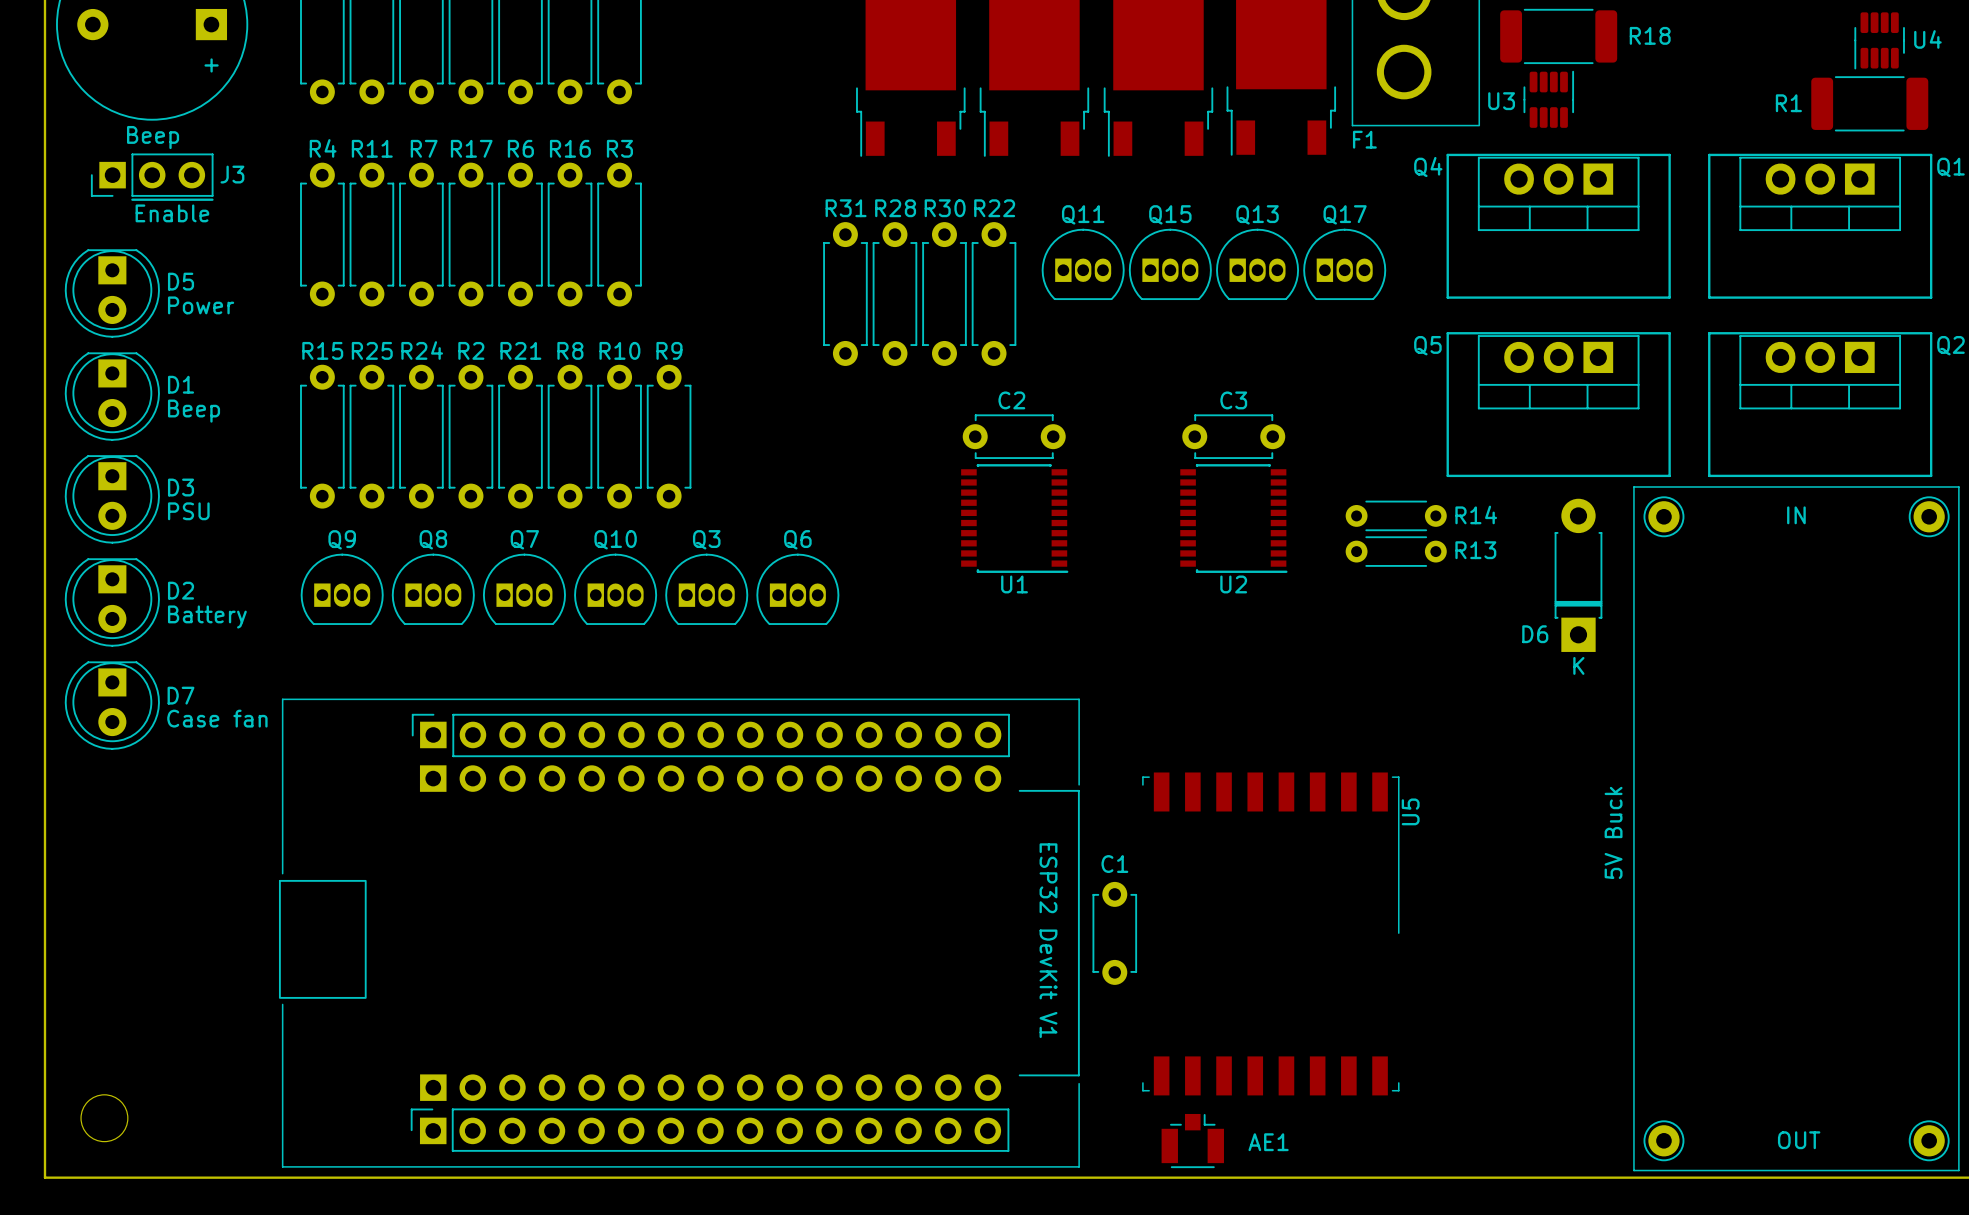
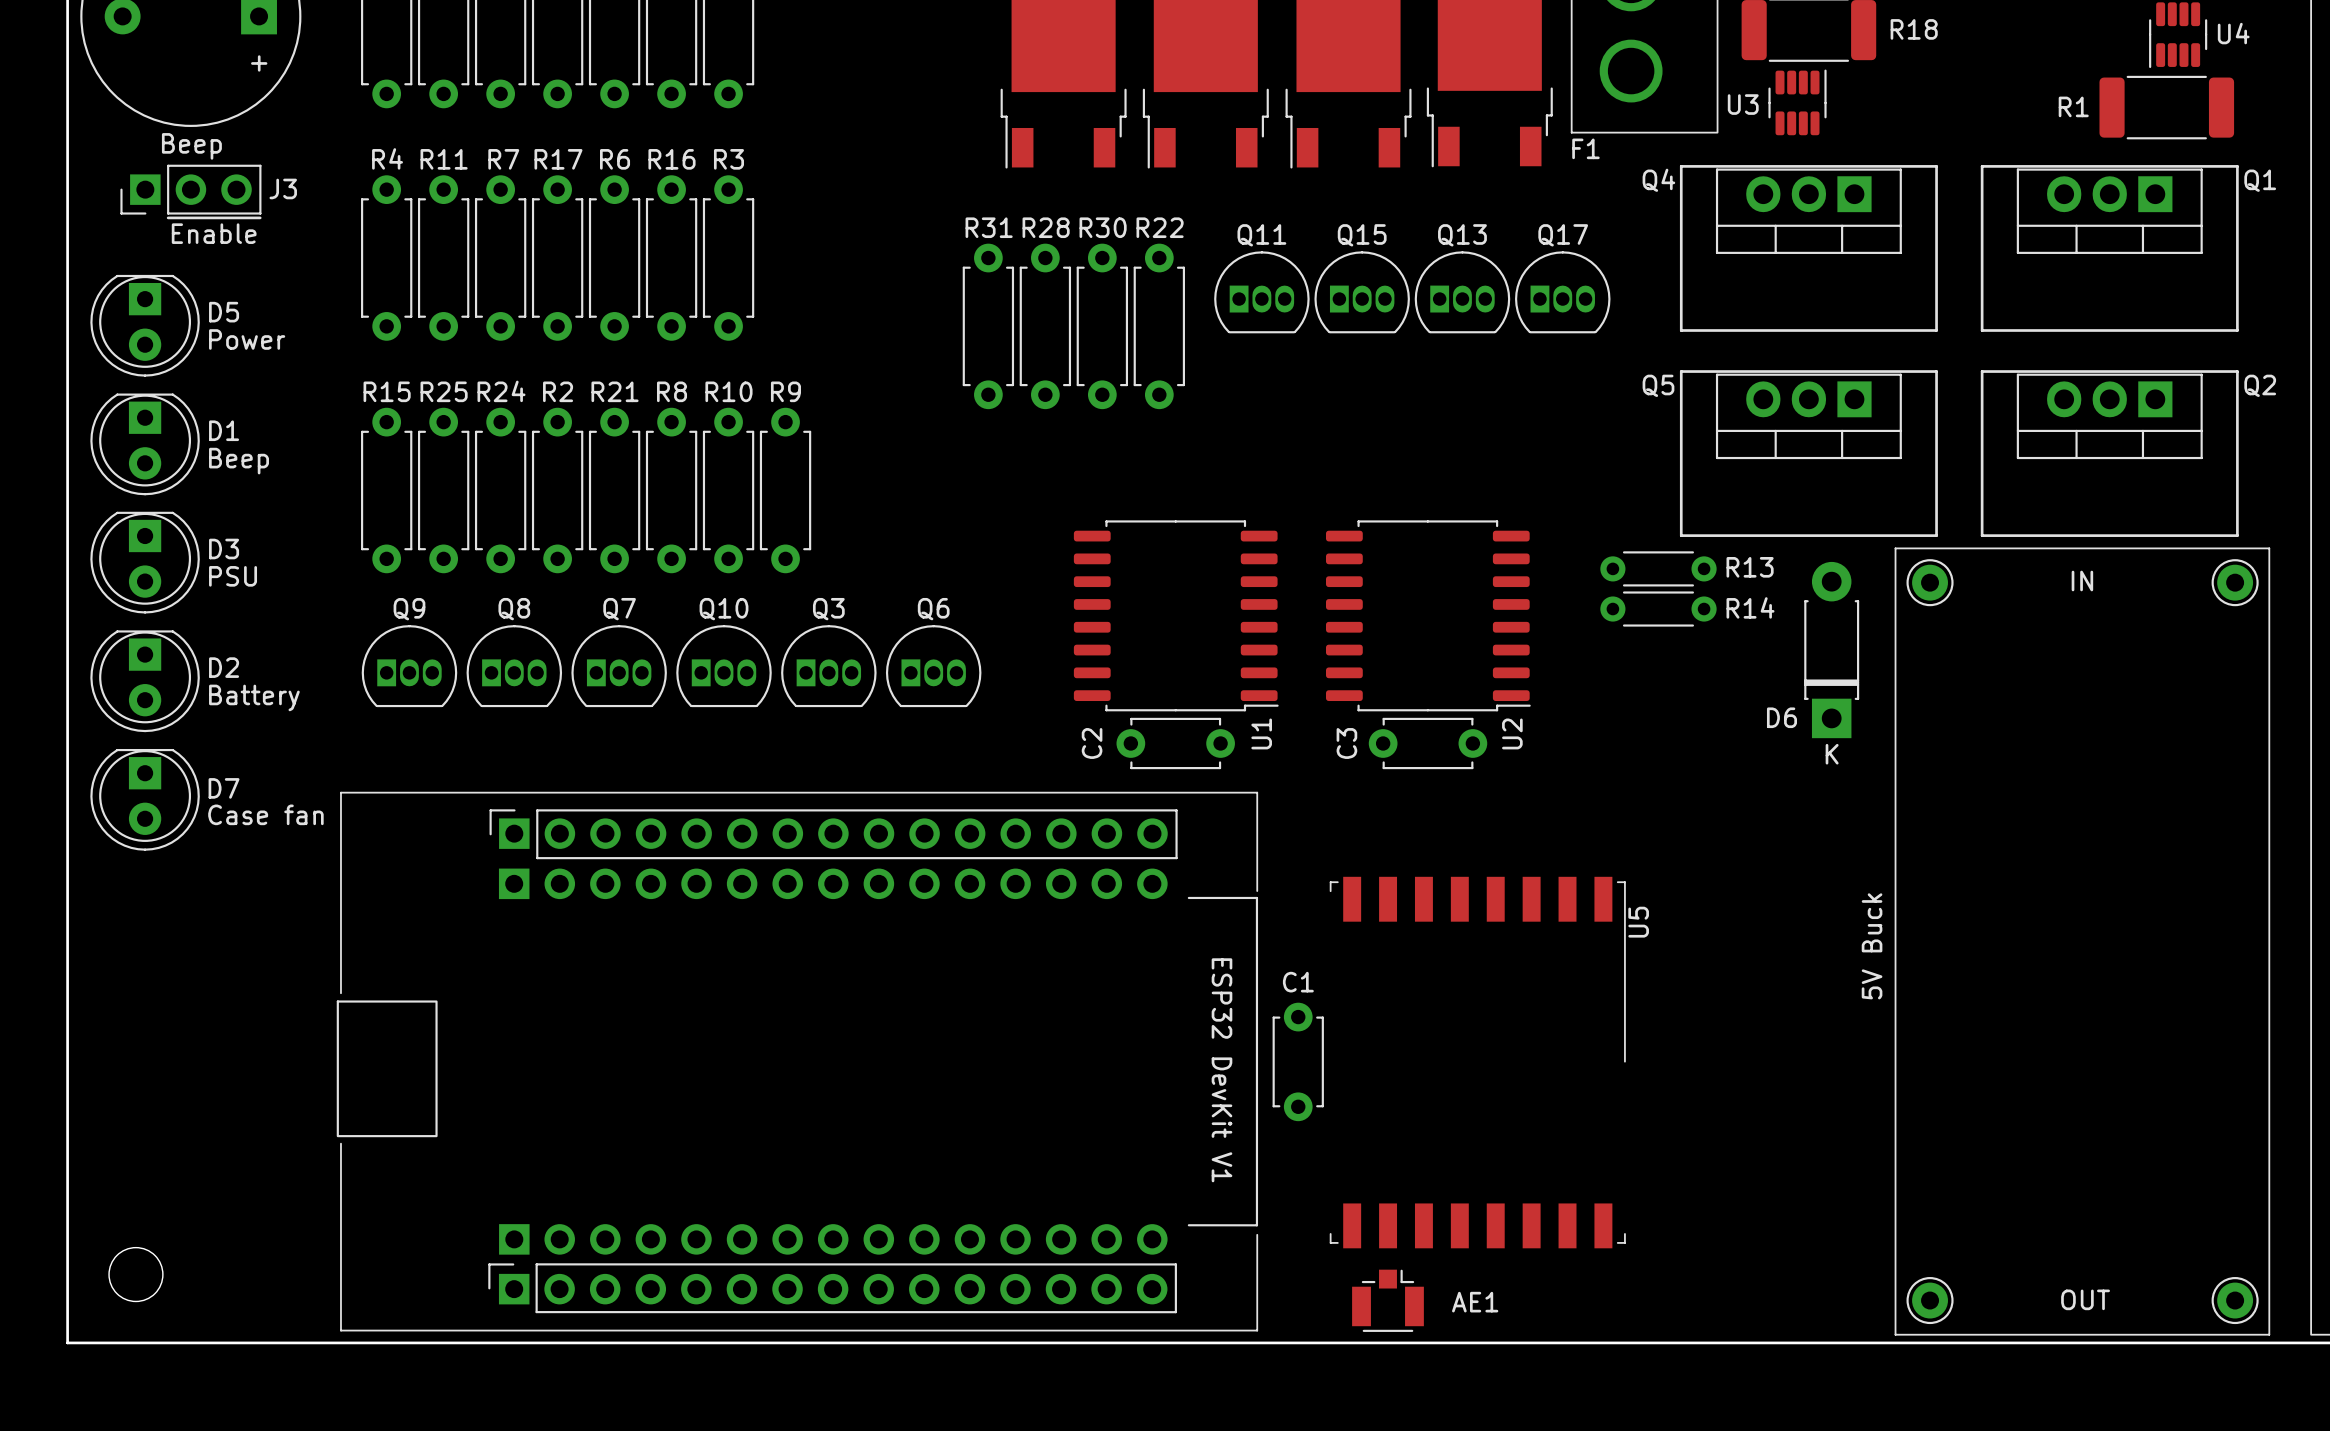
C2 name rotation: 0° (1011, 400) -> 90° counterclockwise (1092, 743)
C2 name position: C2 (1011, 400) -> C2 (1092, 743)
C3 name rotation: 0° (1233, 400) -> 90° counterclockwise (1346, 743)
C3 name position: C3 (1233, 400) -> C3 (1346, 743)
C2 position: (1014, 436) -> (1175, 743)
C3 position: (1233, 436) -> (1428, 743)
U1 footprint: [961, 464, 1069, 573] -> [1073, 520, 1279, 712]
U2 footprint: [1180, 464, 1288, 573] -> [1325, 520, 1531, 712]
R14 position: (1396, 515) -> (1658, 609)
R13 position: (1396, 551) -> (1658, 568)
U1 name position: U1 (1014, 584) -> U1 (1261, 733)
U2 name position: U2 (1233, 584) -> U2 (1512, 733)

